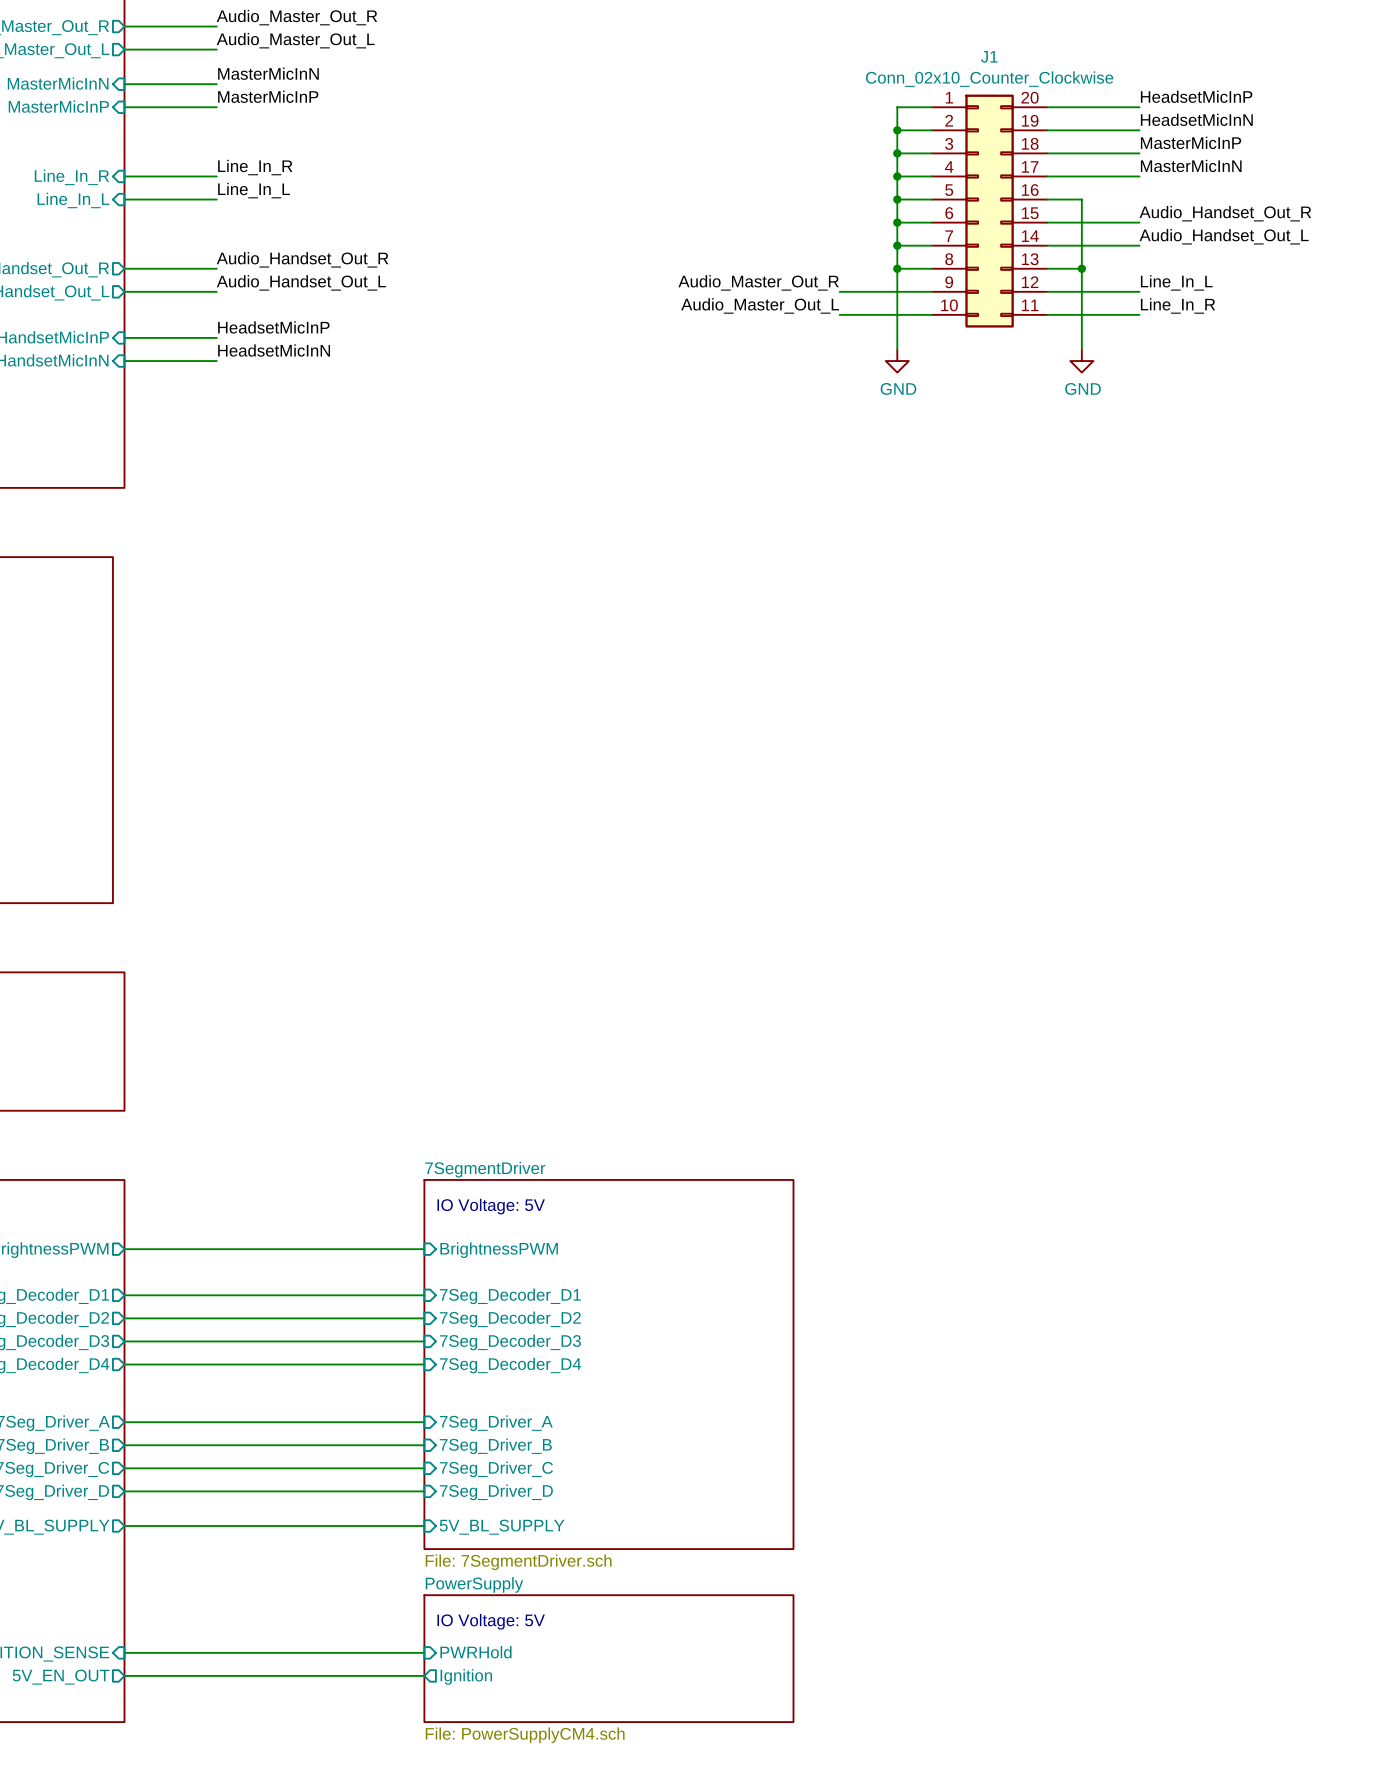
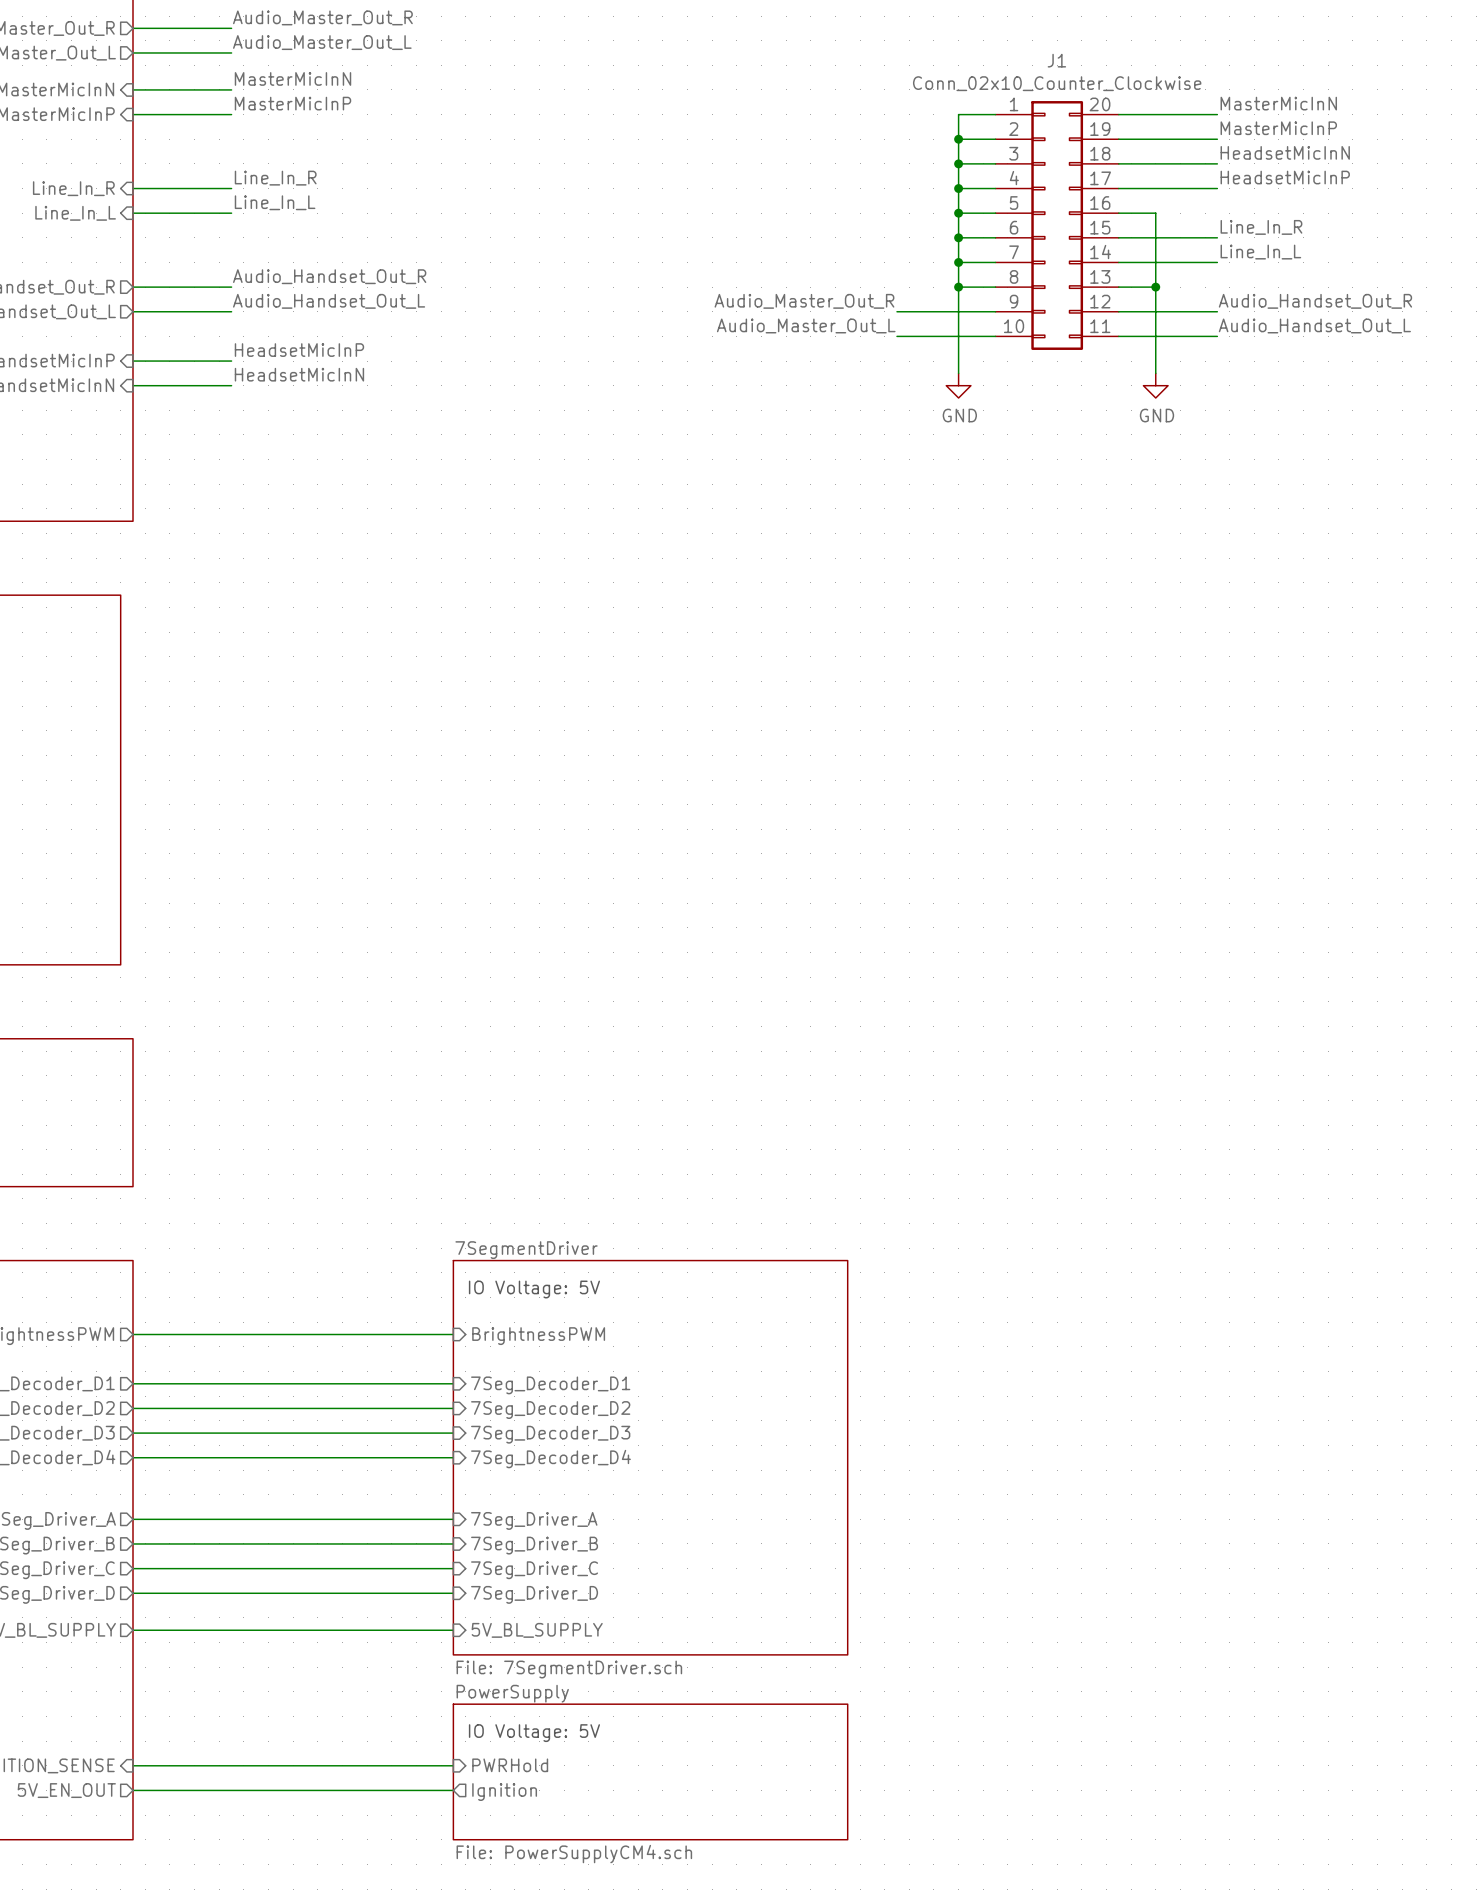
label: HeadsetMicInP (1196, 96) -> MasterMicInN (1278, 103)
label: HeadsetMicInN (1196, 119) -> MasterMicInP (1278, 128)
label: MasterMicInP (1191, 142) -> HeadsetMicInN (1285, 152)
label: MasterMicInN (1191, 165) -> HeadsetMicInP (1285, 177)
label: Audio_Handset_Out_R (1225, 213) -> Line_In_R (1261, 227)
label: Audio_Handset_Out_L (1224, 236) -> Line_In_L (1260, 252)
label: Line_In_L (1176, 282) -> Audio_Handset_Out_R (1315, 301)
label: Line_In_R (1178, 305) -> Audio_Handset_Out_L (1314, 325)

